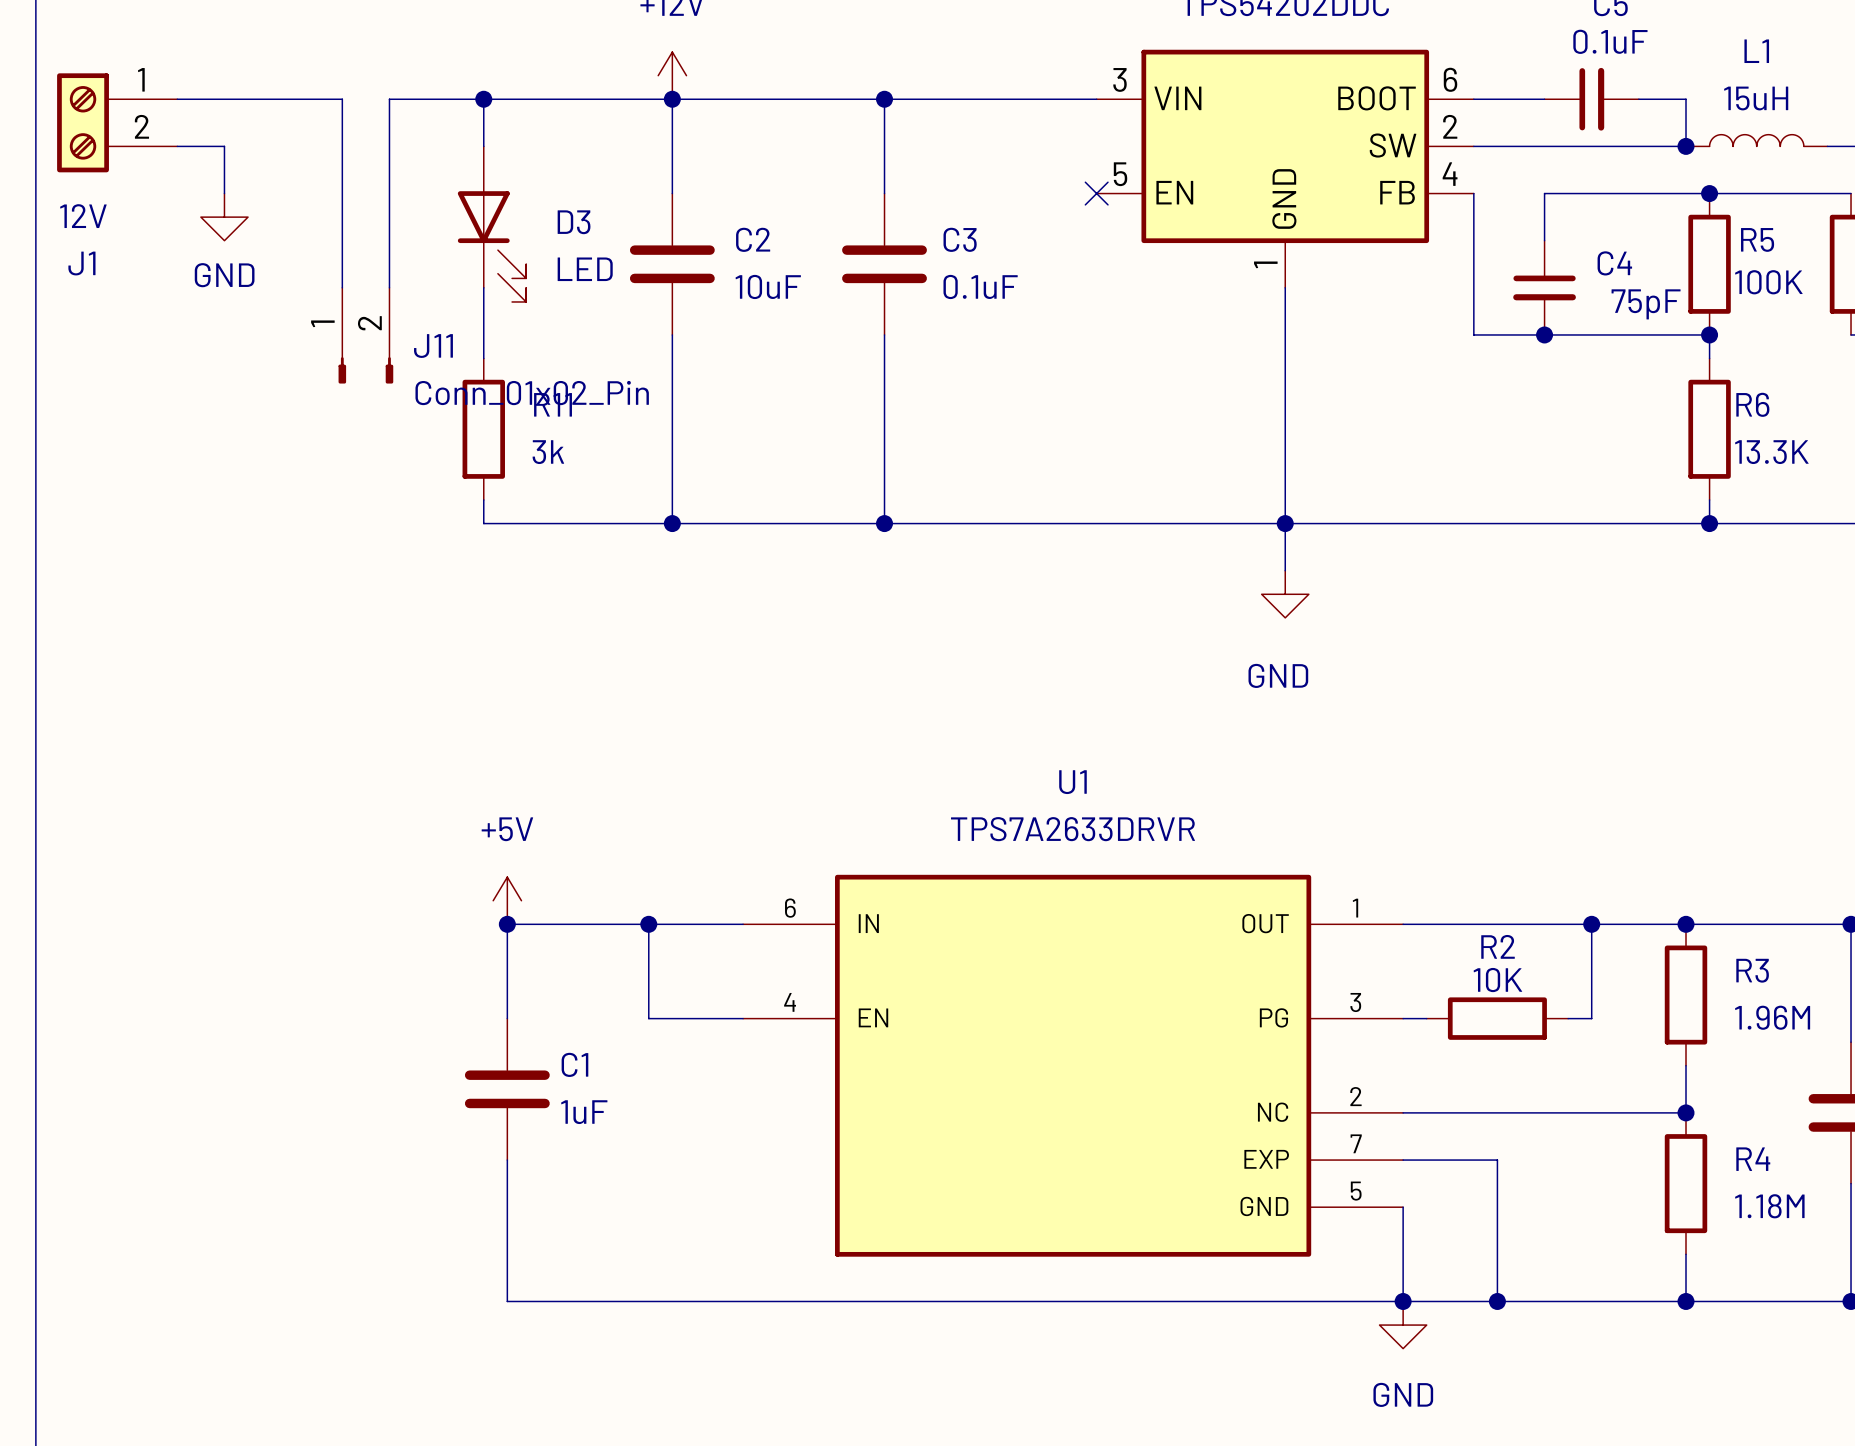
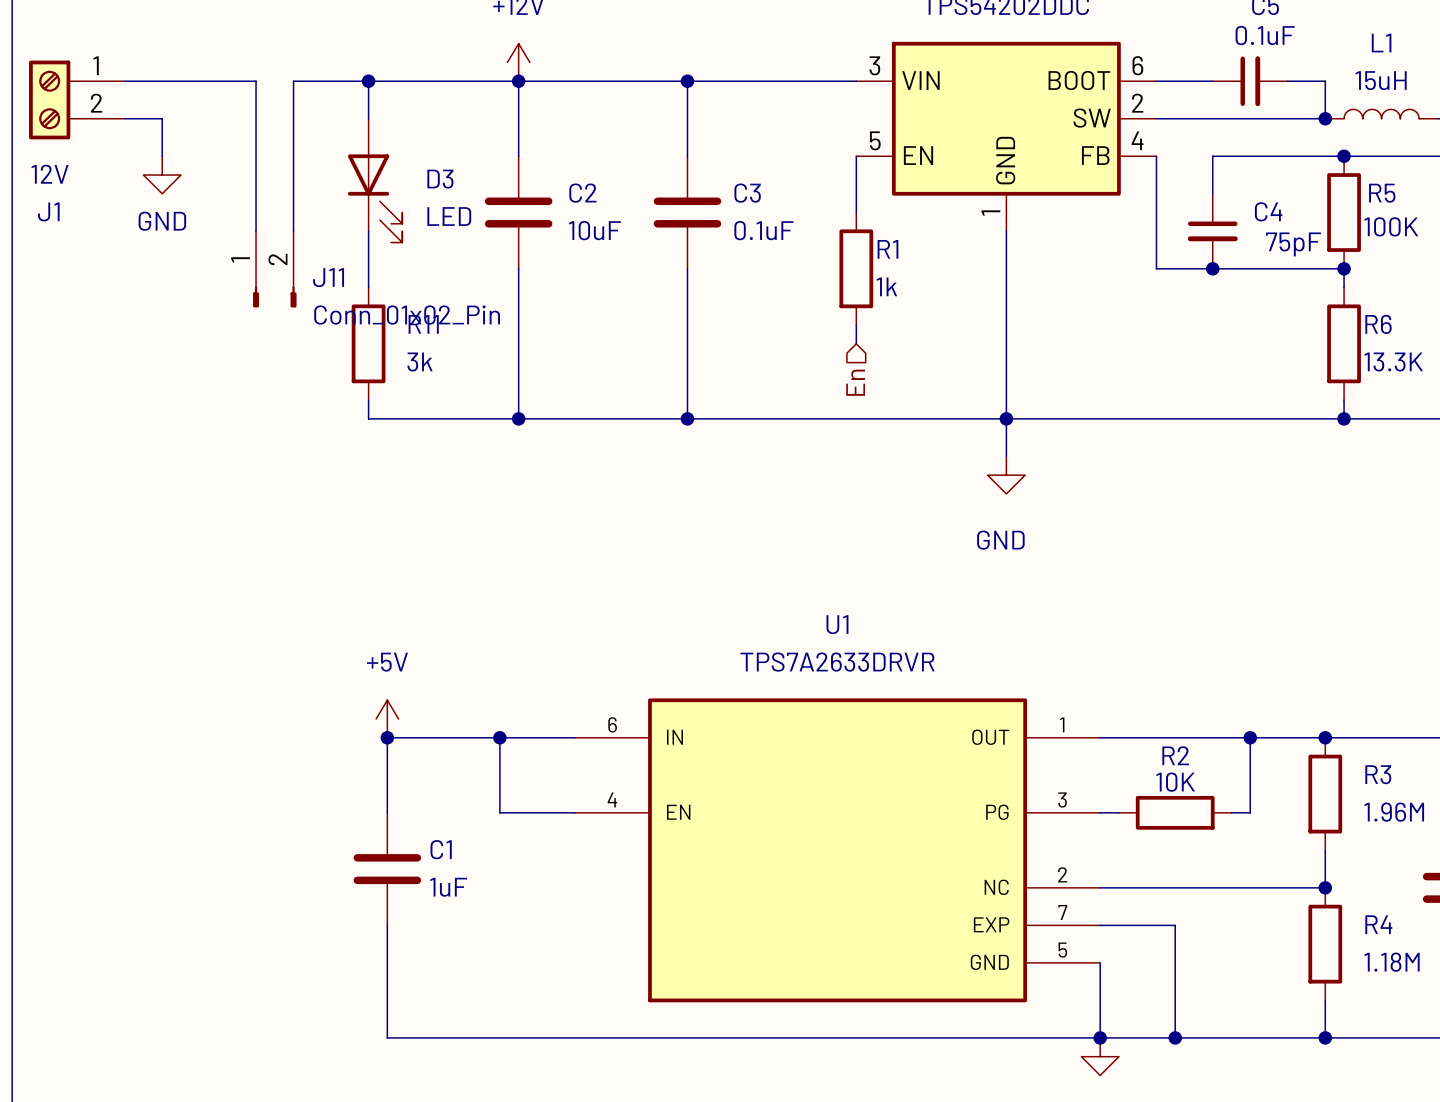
wire: none -> (856, 156) (856, 212)
no-connect mark: (1096, 193) -> none
R1: none -> 1k (856, 268)
wire: none -> (856, 325) (856, 343)
hierarchical label: none -> En (855, 382)

